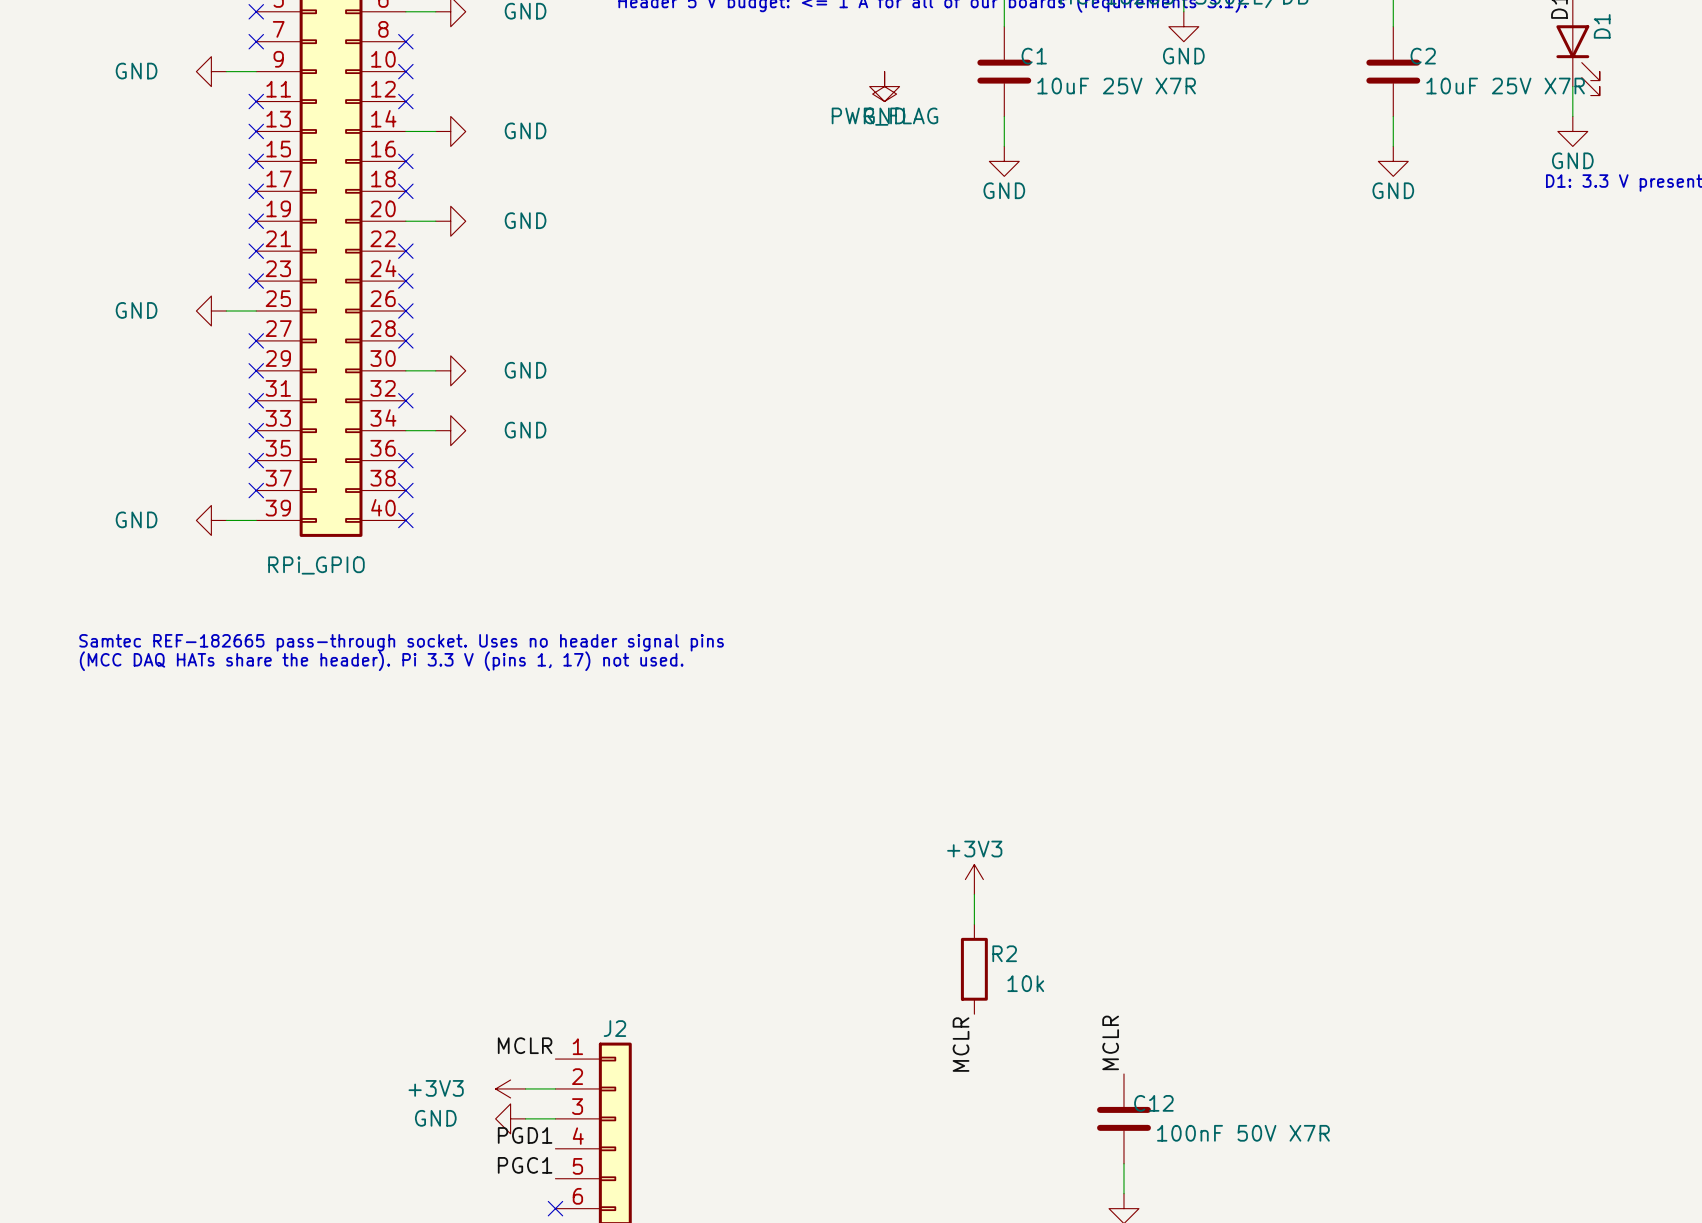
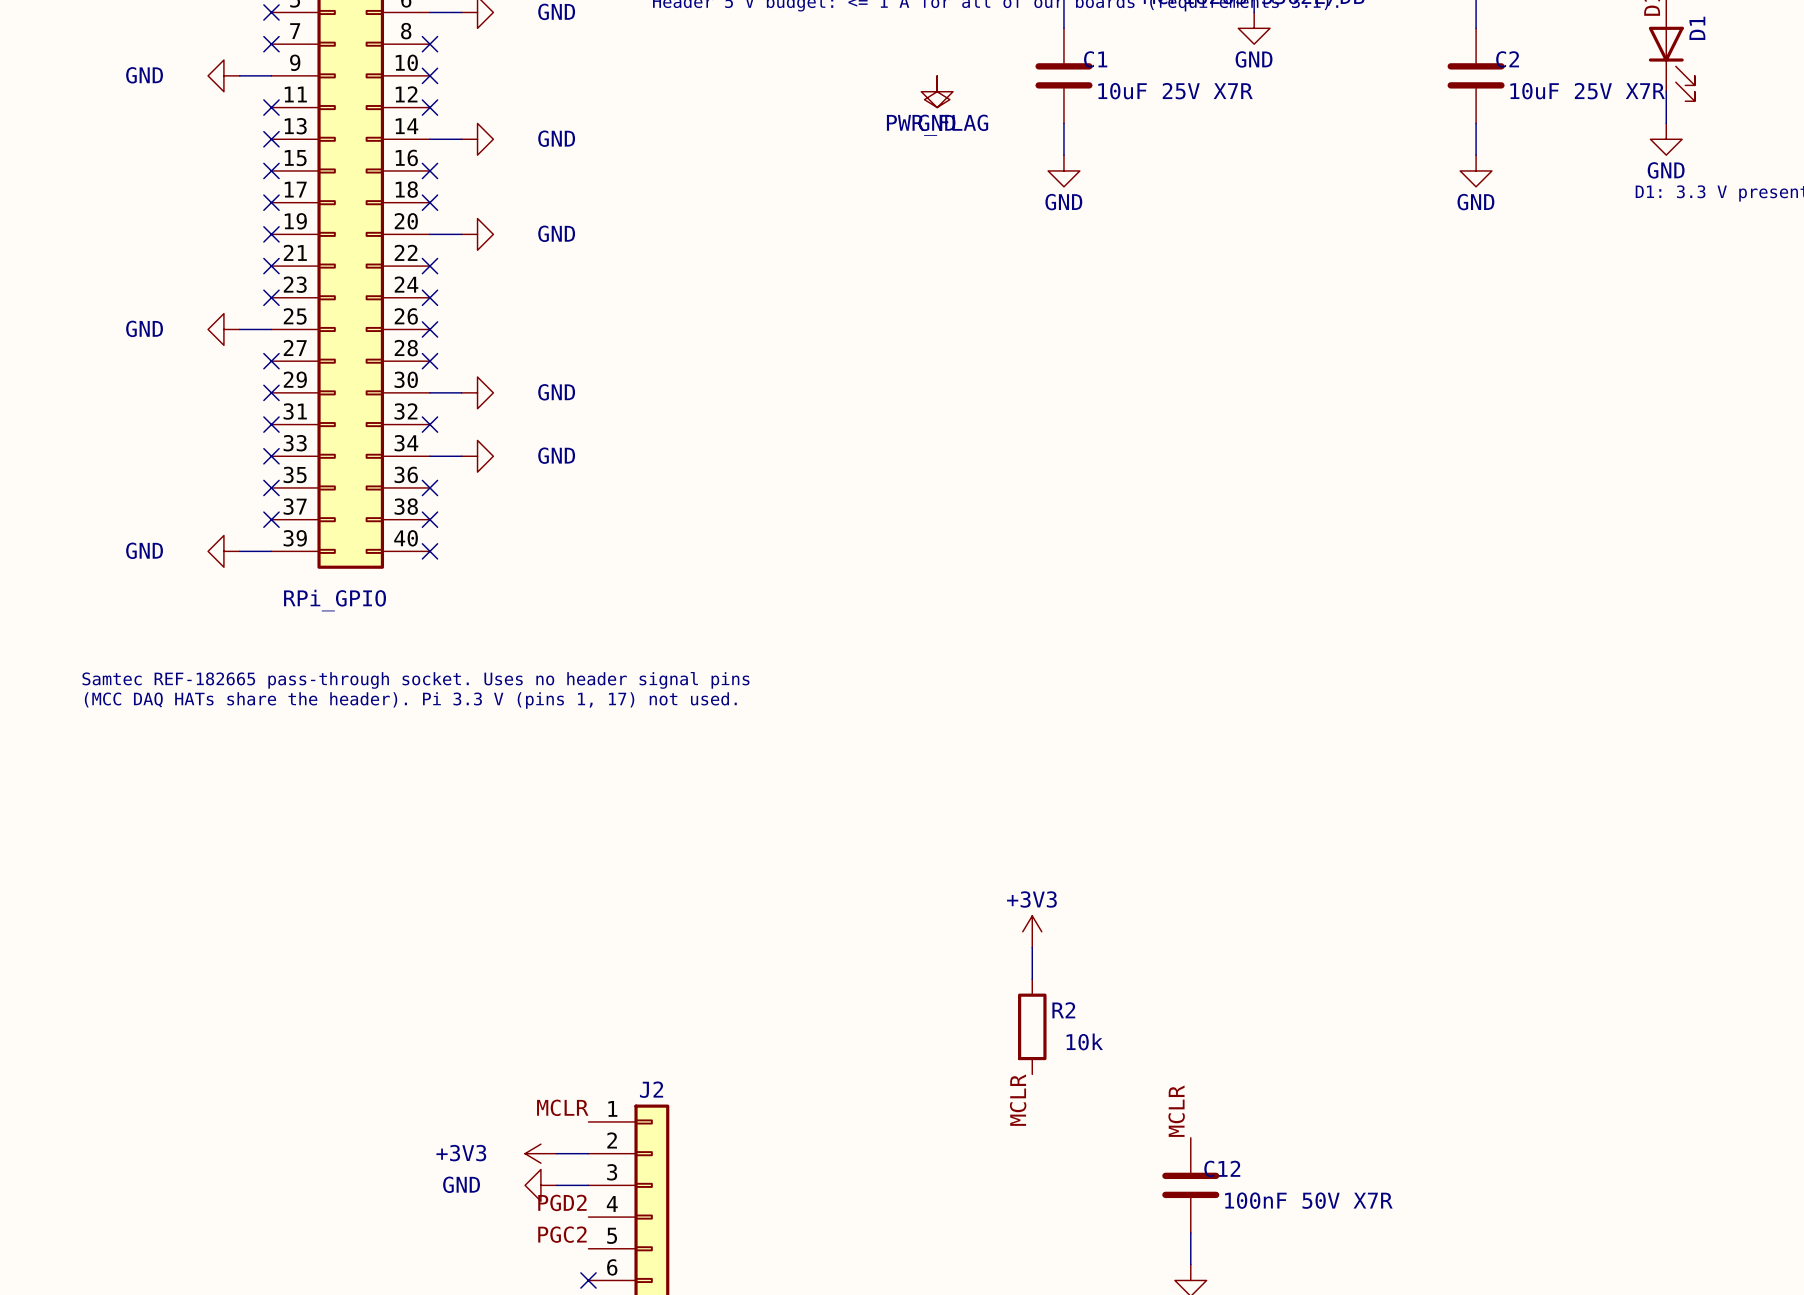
label: PGD1 (525, 1135) -> PGD2 (562, 1202)
label: PGC1 (525, 1165) -> PGC2 (562, 1234)

